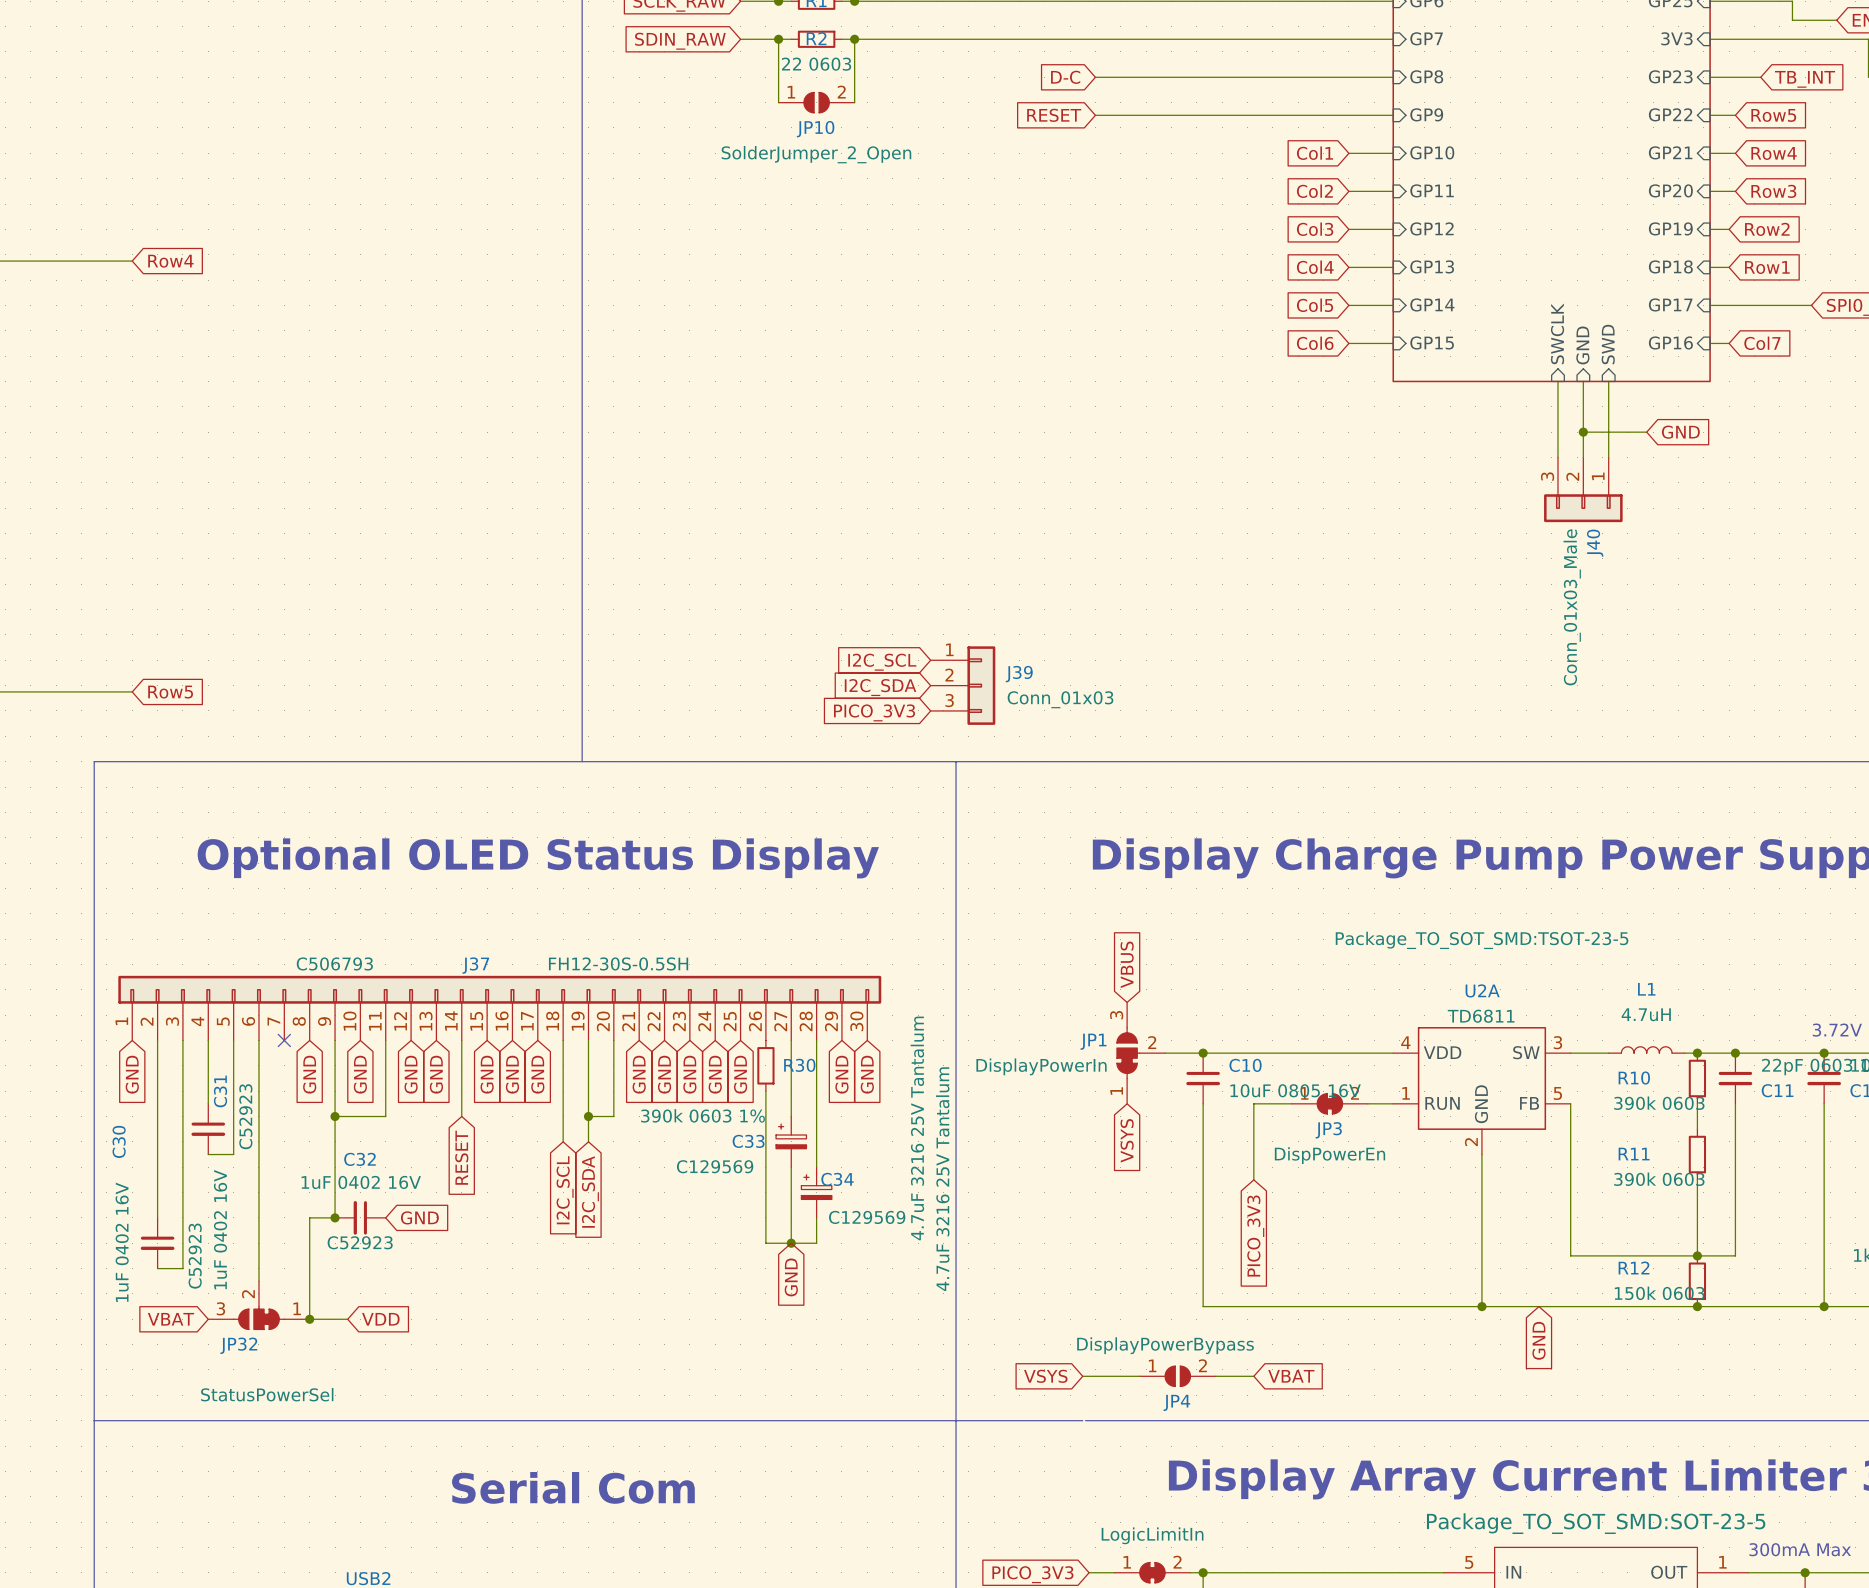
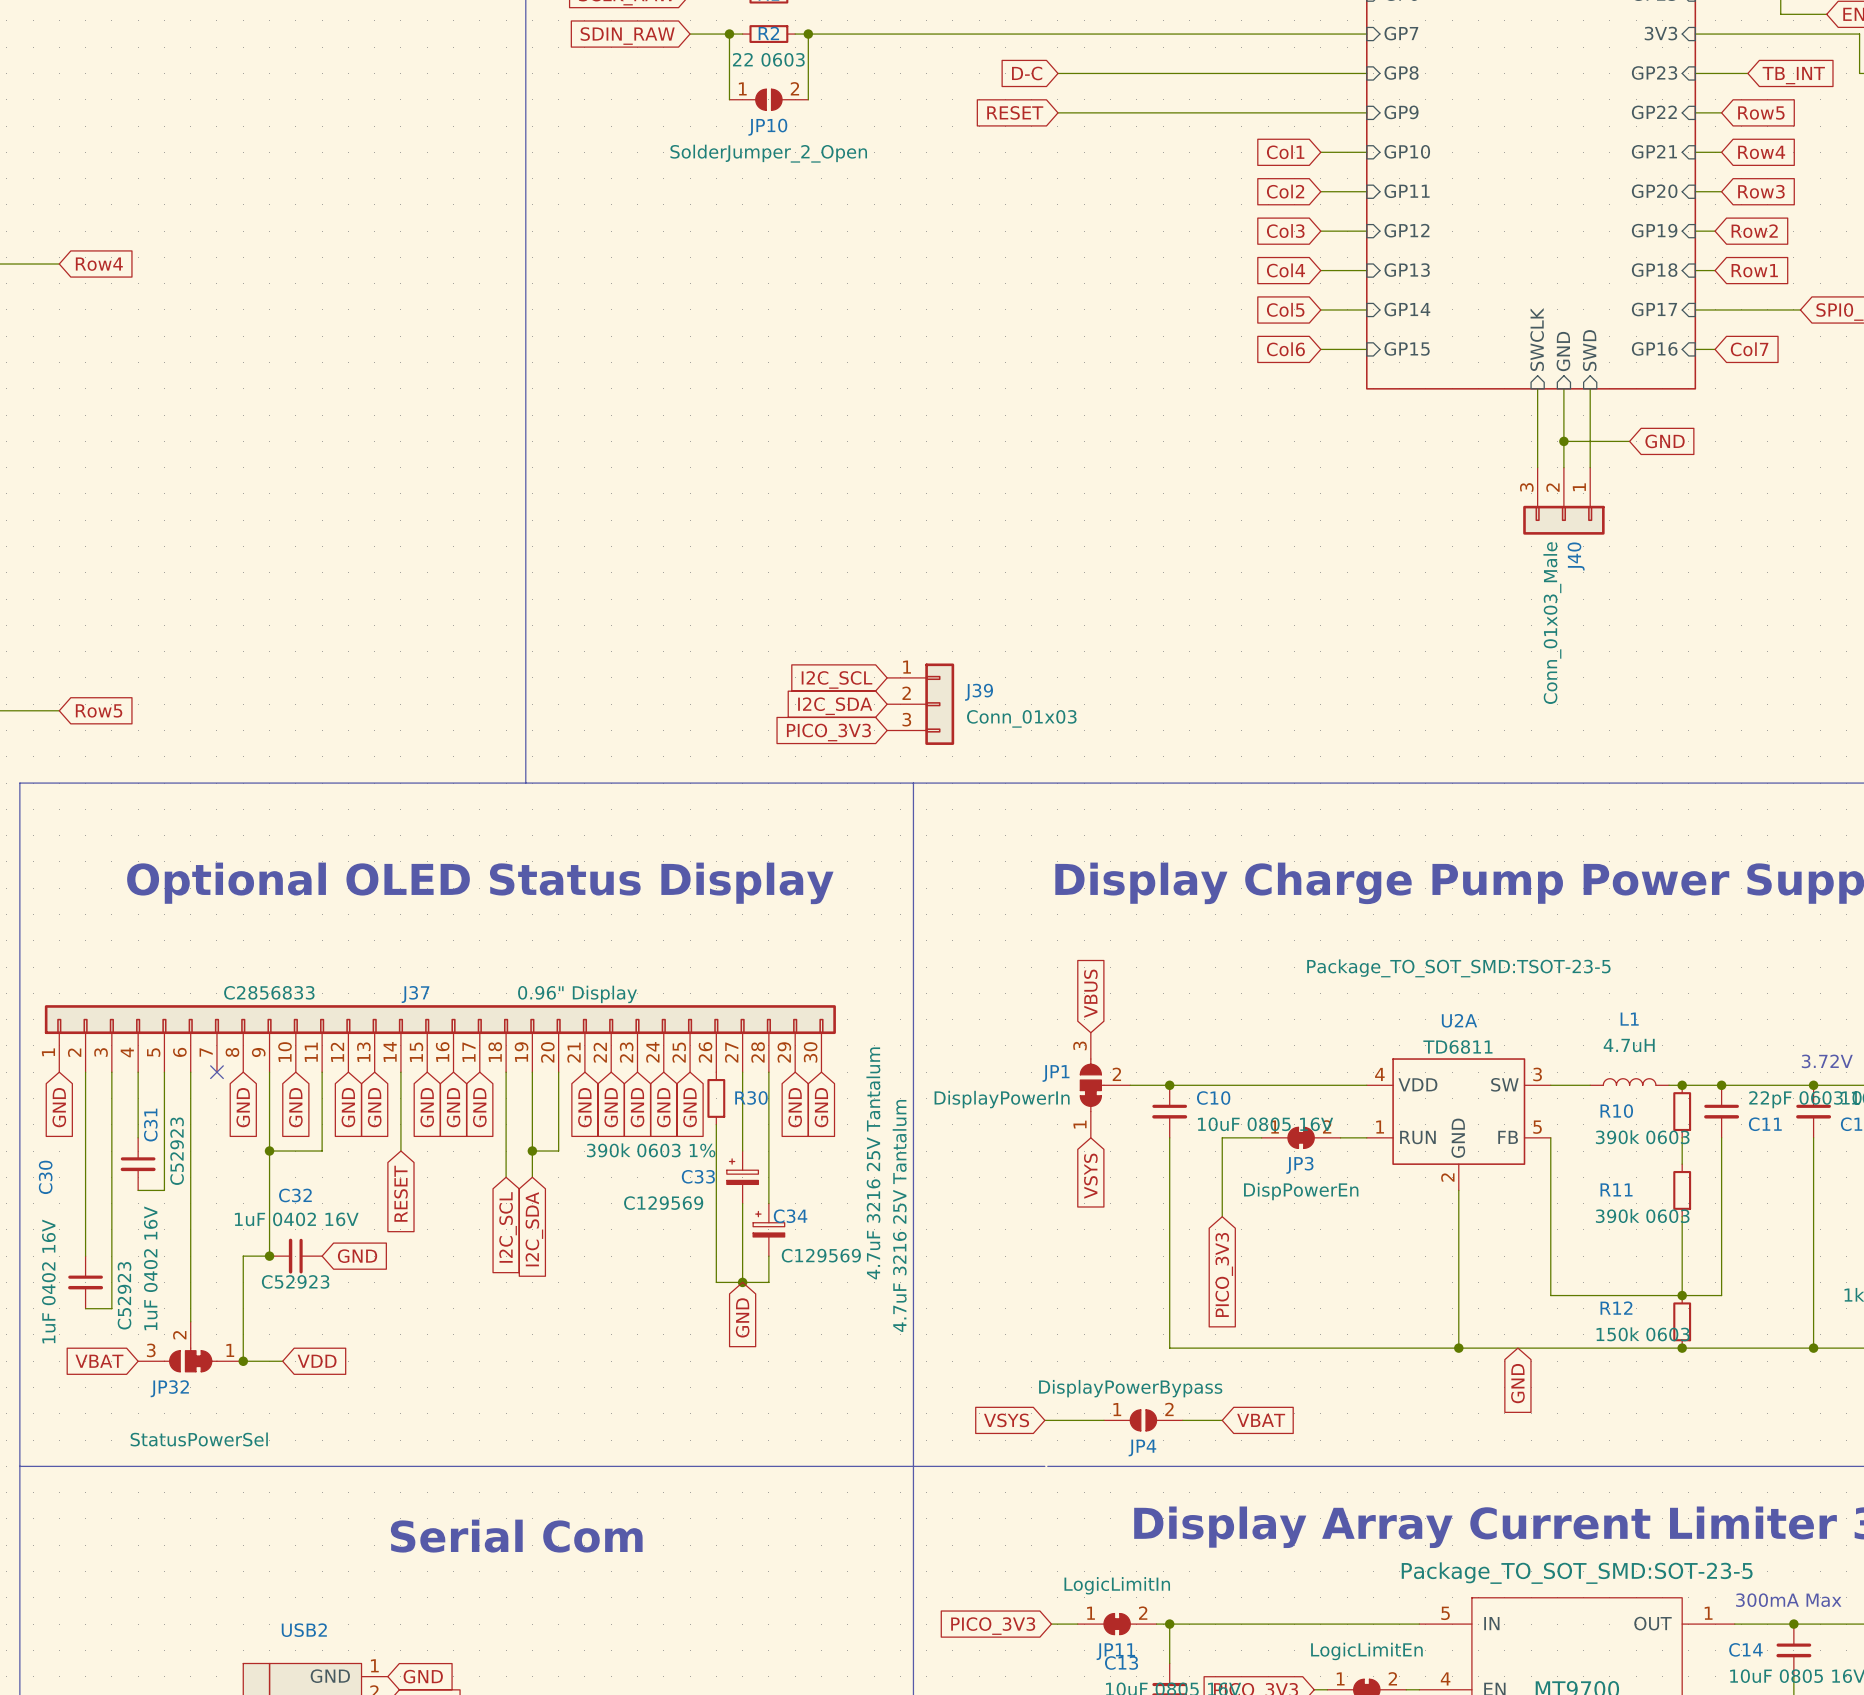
J37 text: C506793 (334, 963) -> C2856833 (269, 992)
J37 value: FH12-30S-0.5SH (618, 963) -> 0.96" Display (577, 994)

